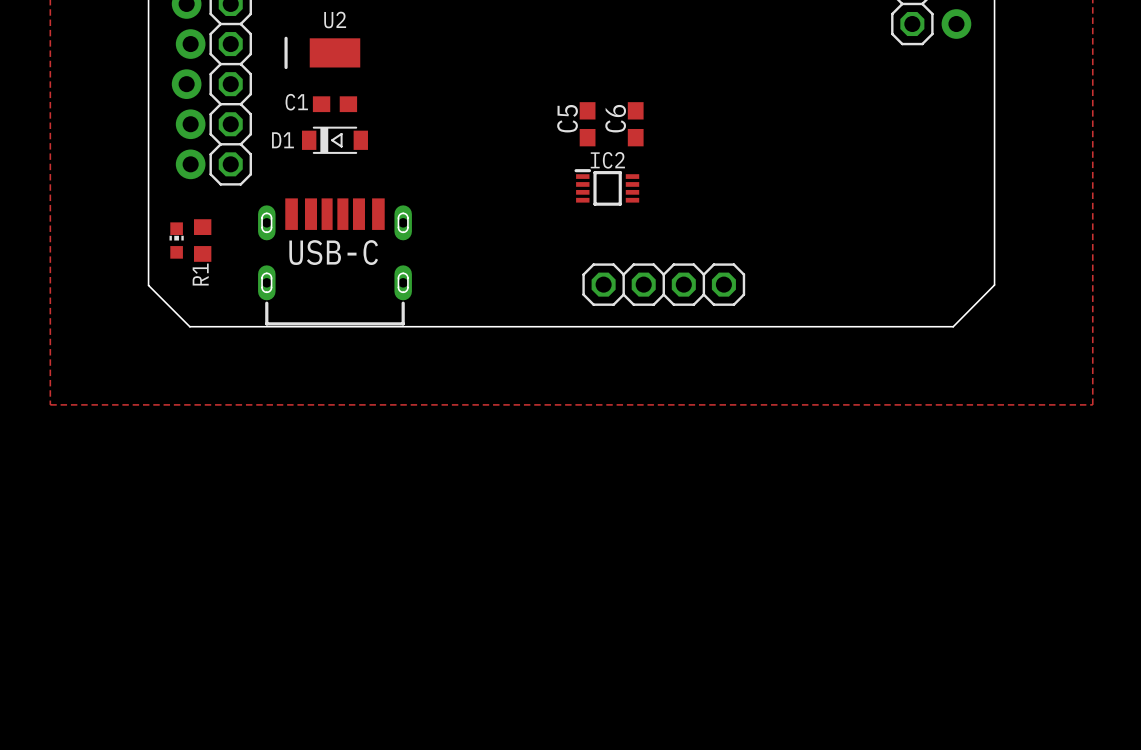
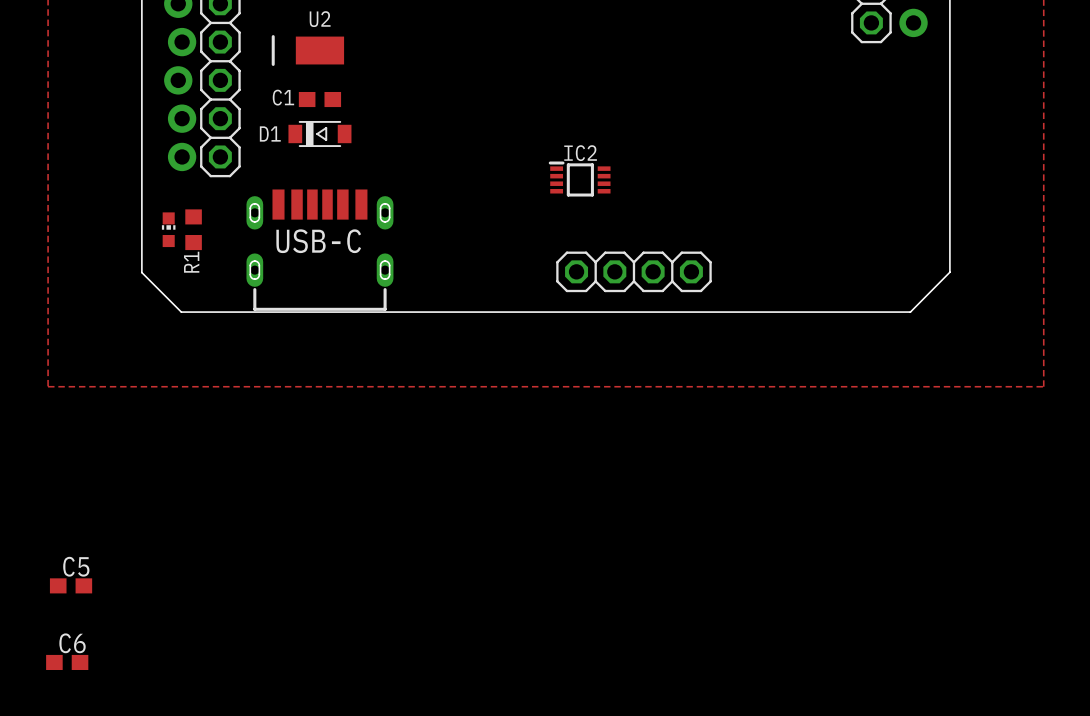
C5 rotation: 0° (587, 124) -> 90° clockwise (71, 585)
C5 position: (587, 124) -> (71, 585)
C6 rotation: 0° (635, 124) -> 90° clockwise (67, 662)
C6 position: (635, 124) -> (67, 662)

